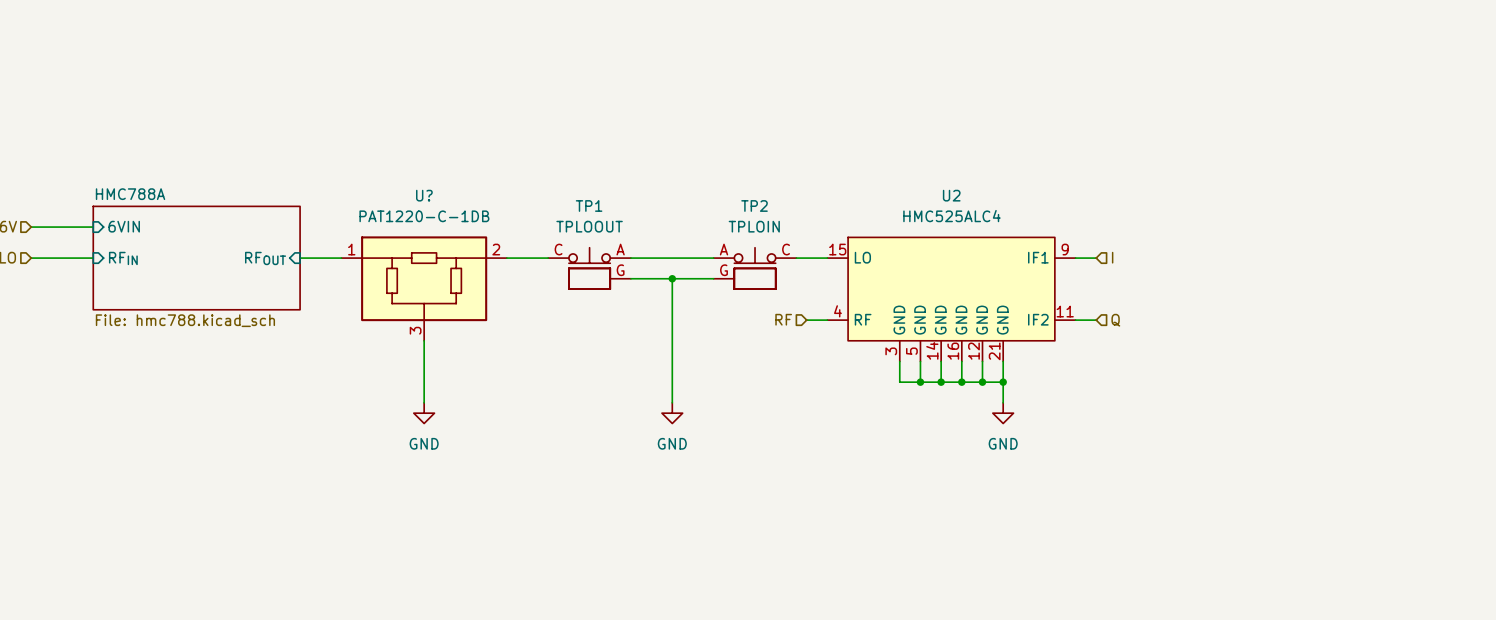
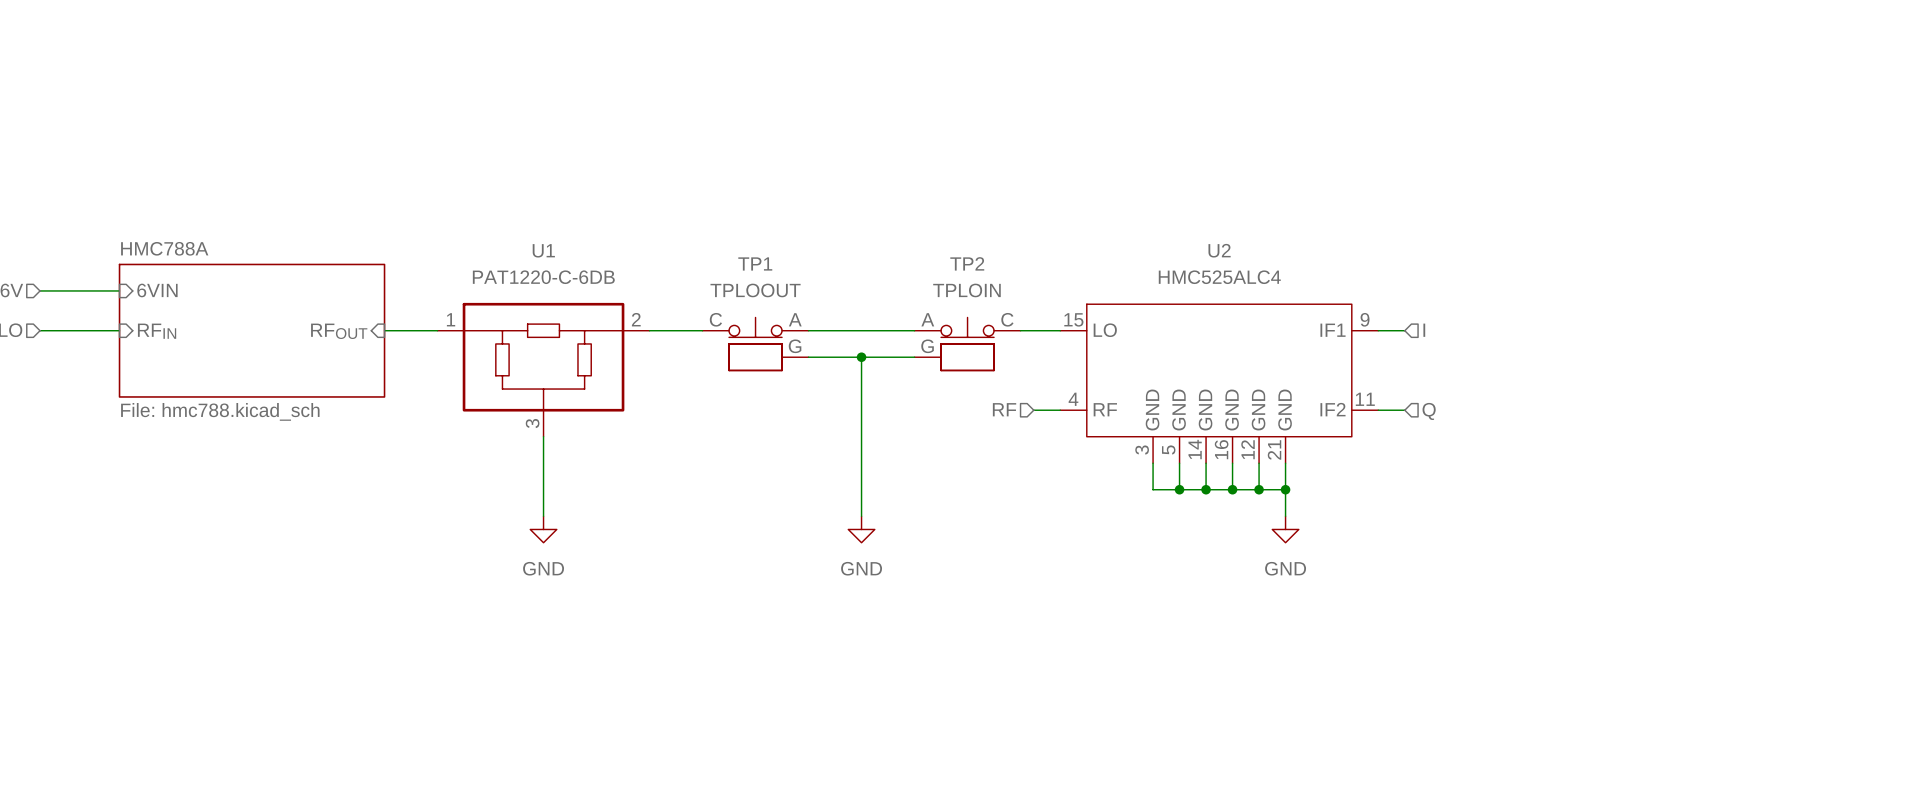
U? name: U? (424, 195) -> U1 (543, 250)
U? value: PAT1220-C-1DB (424, 216) -> PAT1220-C-6DB (543, 277)

